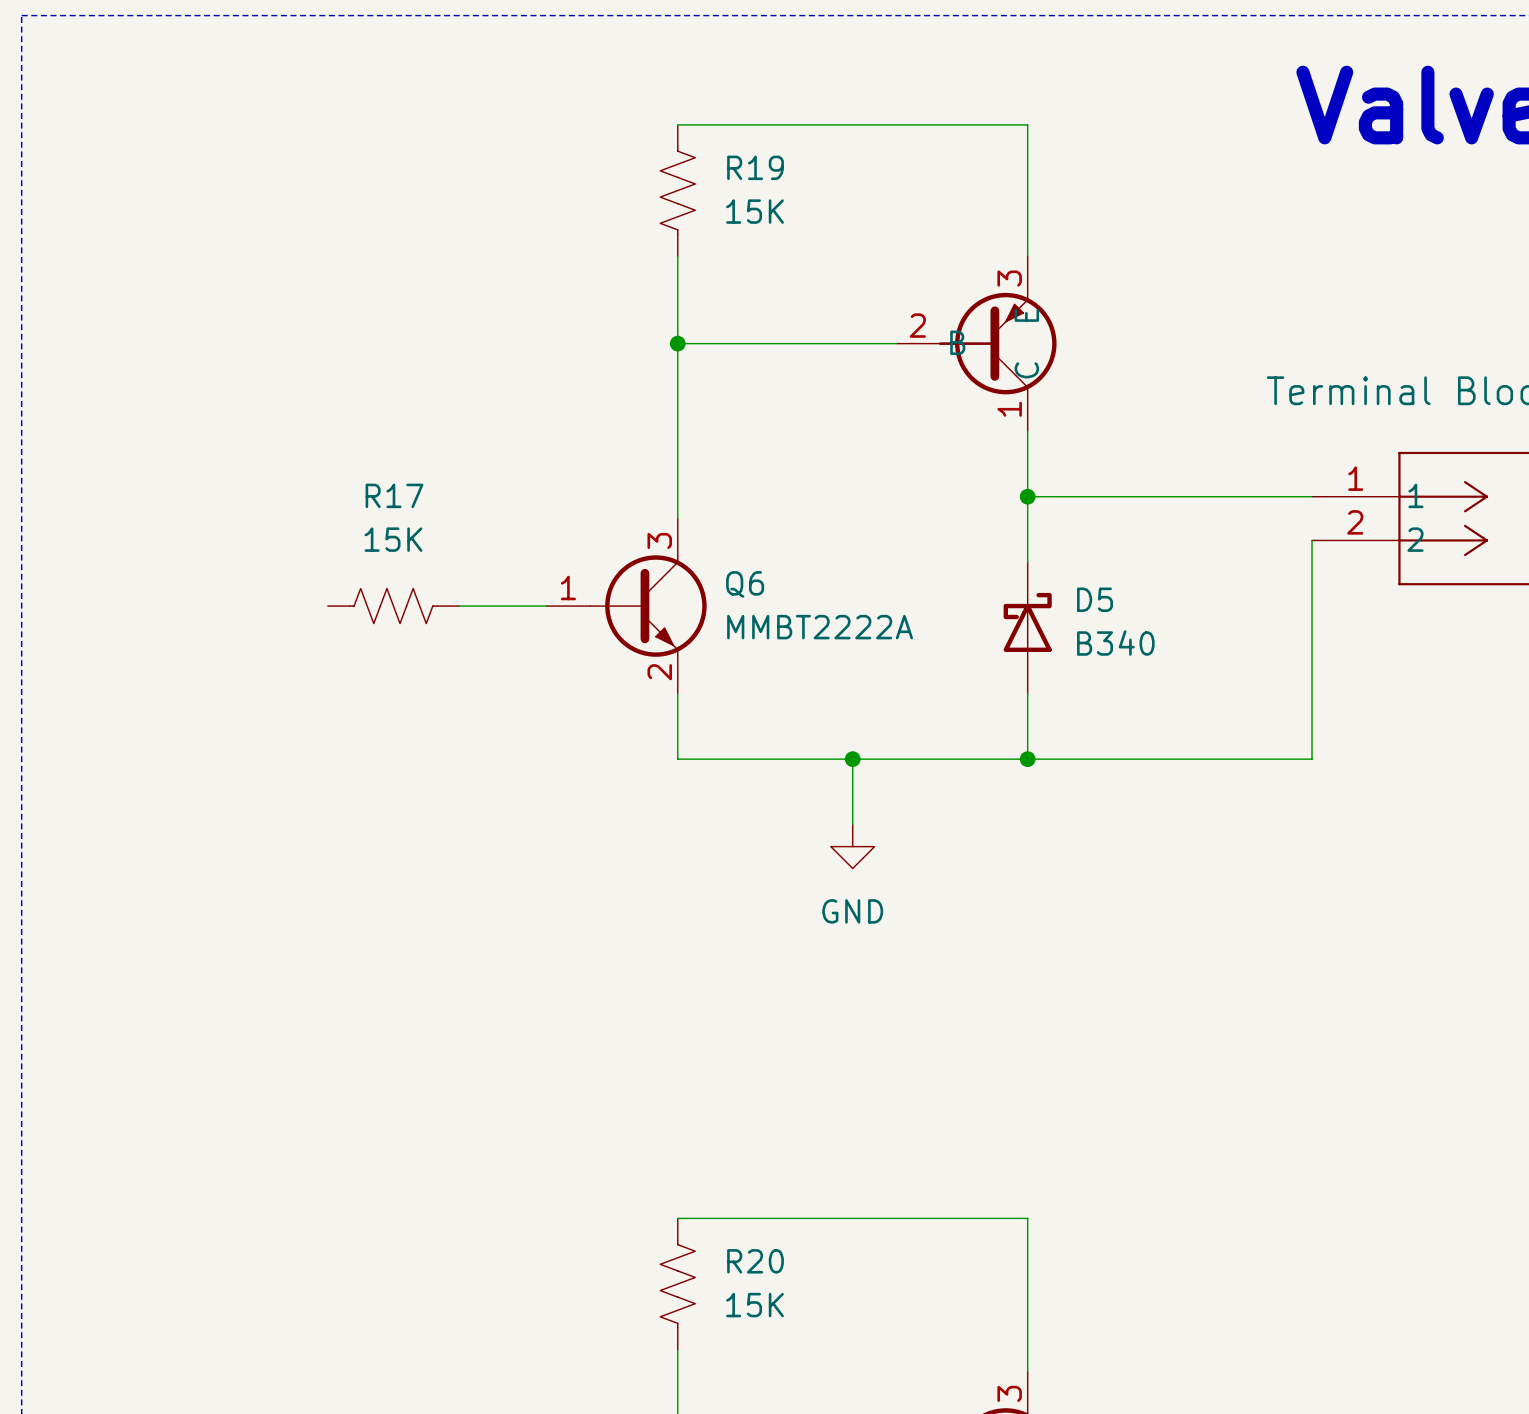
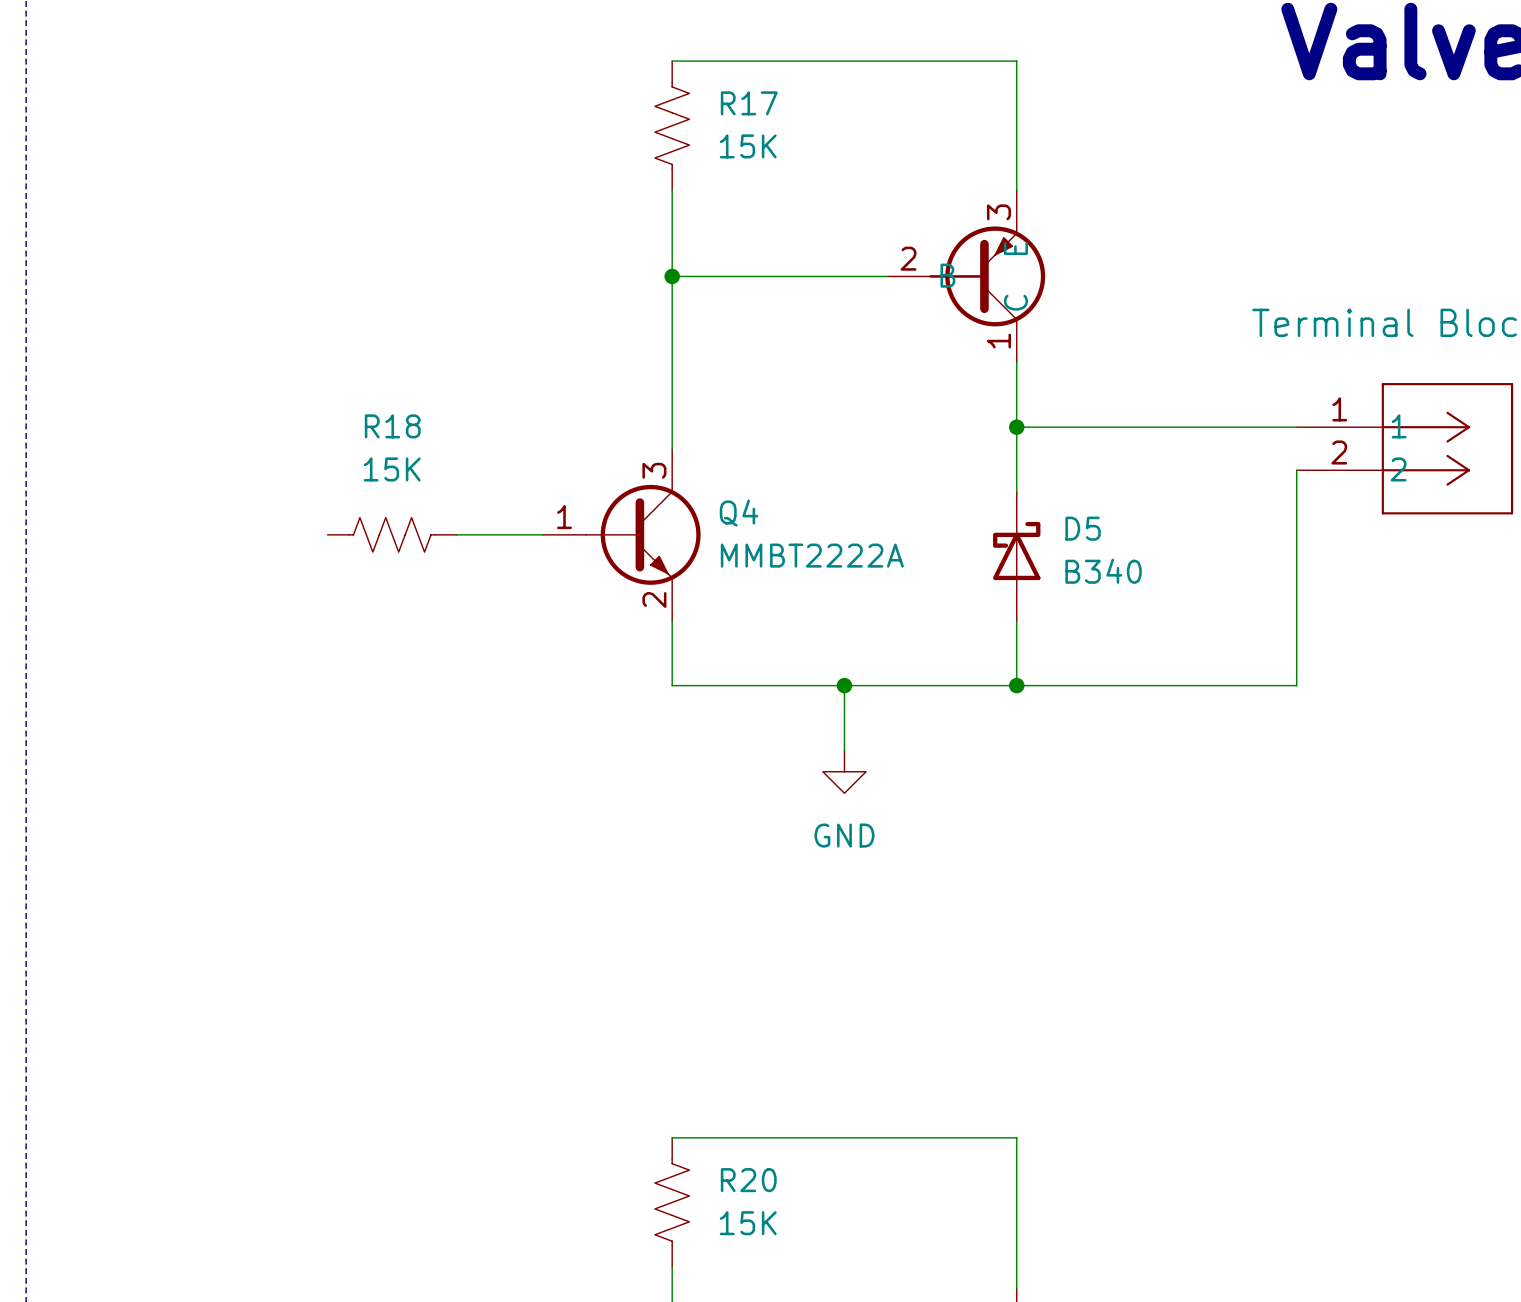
R19 name: R19 (755, 167) -> R17 (749, 103)
R17 name: R17 (394, 495) -> R18 (392, 426)
Q6 name: Q6 (745, 584) -> Q4 (739, 513)

